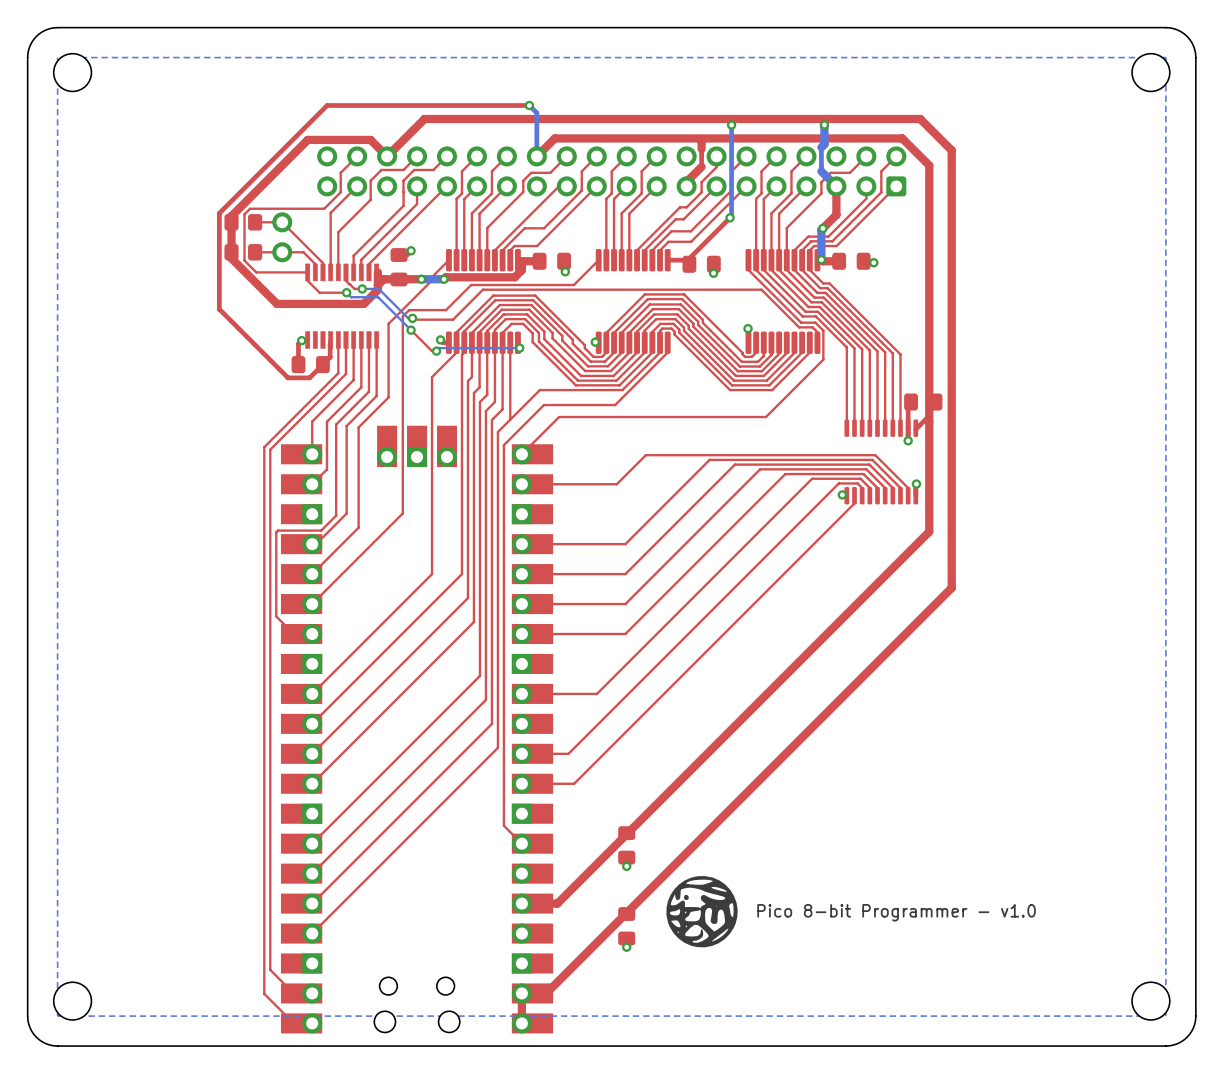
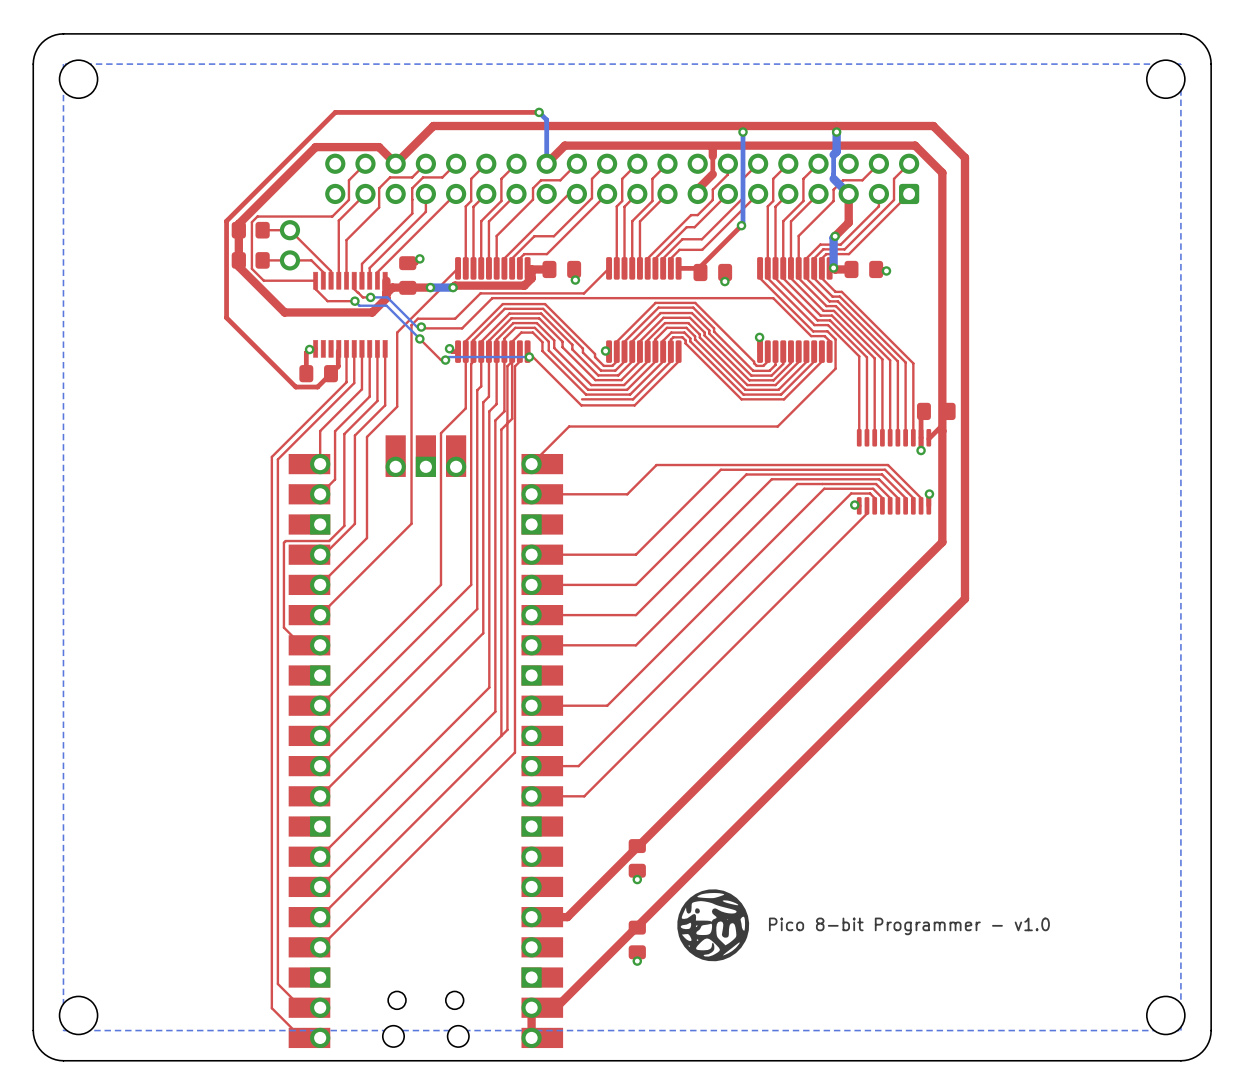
top track: (456, 352) (432, 377) (432, 423) -> (465, 361) (465, 408) (440, 433)
top track: (510, 352) (510, 419) -> (519, 361) (514, 366) (514, 752) (507, 760)
top track: (571, 390) (539, 390) (497, 432) -> (512, 361) (507, 366) (507, 441)
top track: (624, 396) (615, 405) (544, 405) (503, 445) (503, 825) (521, 843) -> (634, 405) (581, 405) (527, 351)
top track: (497, 717) (497, 747) -> (507, 729) (501, 735)

